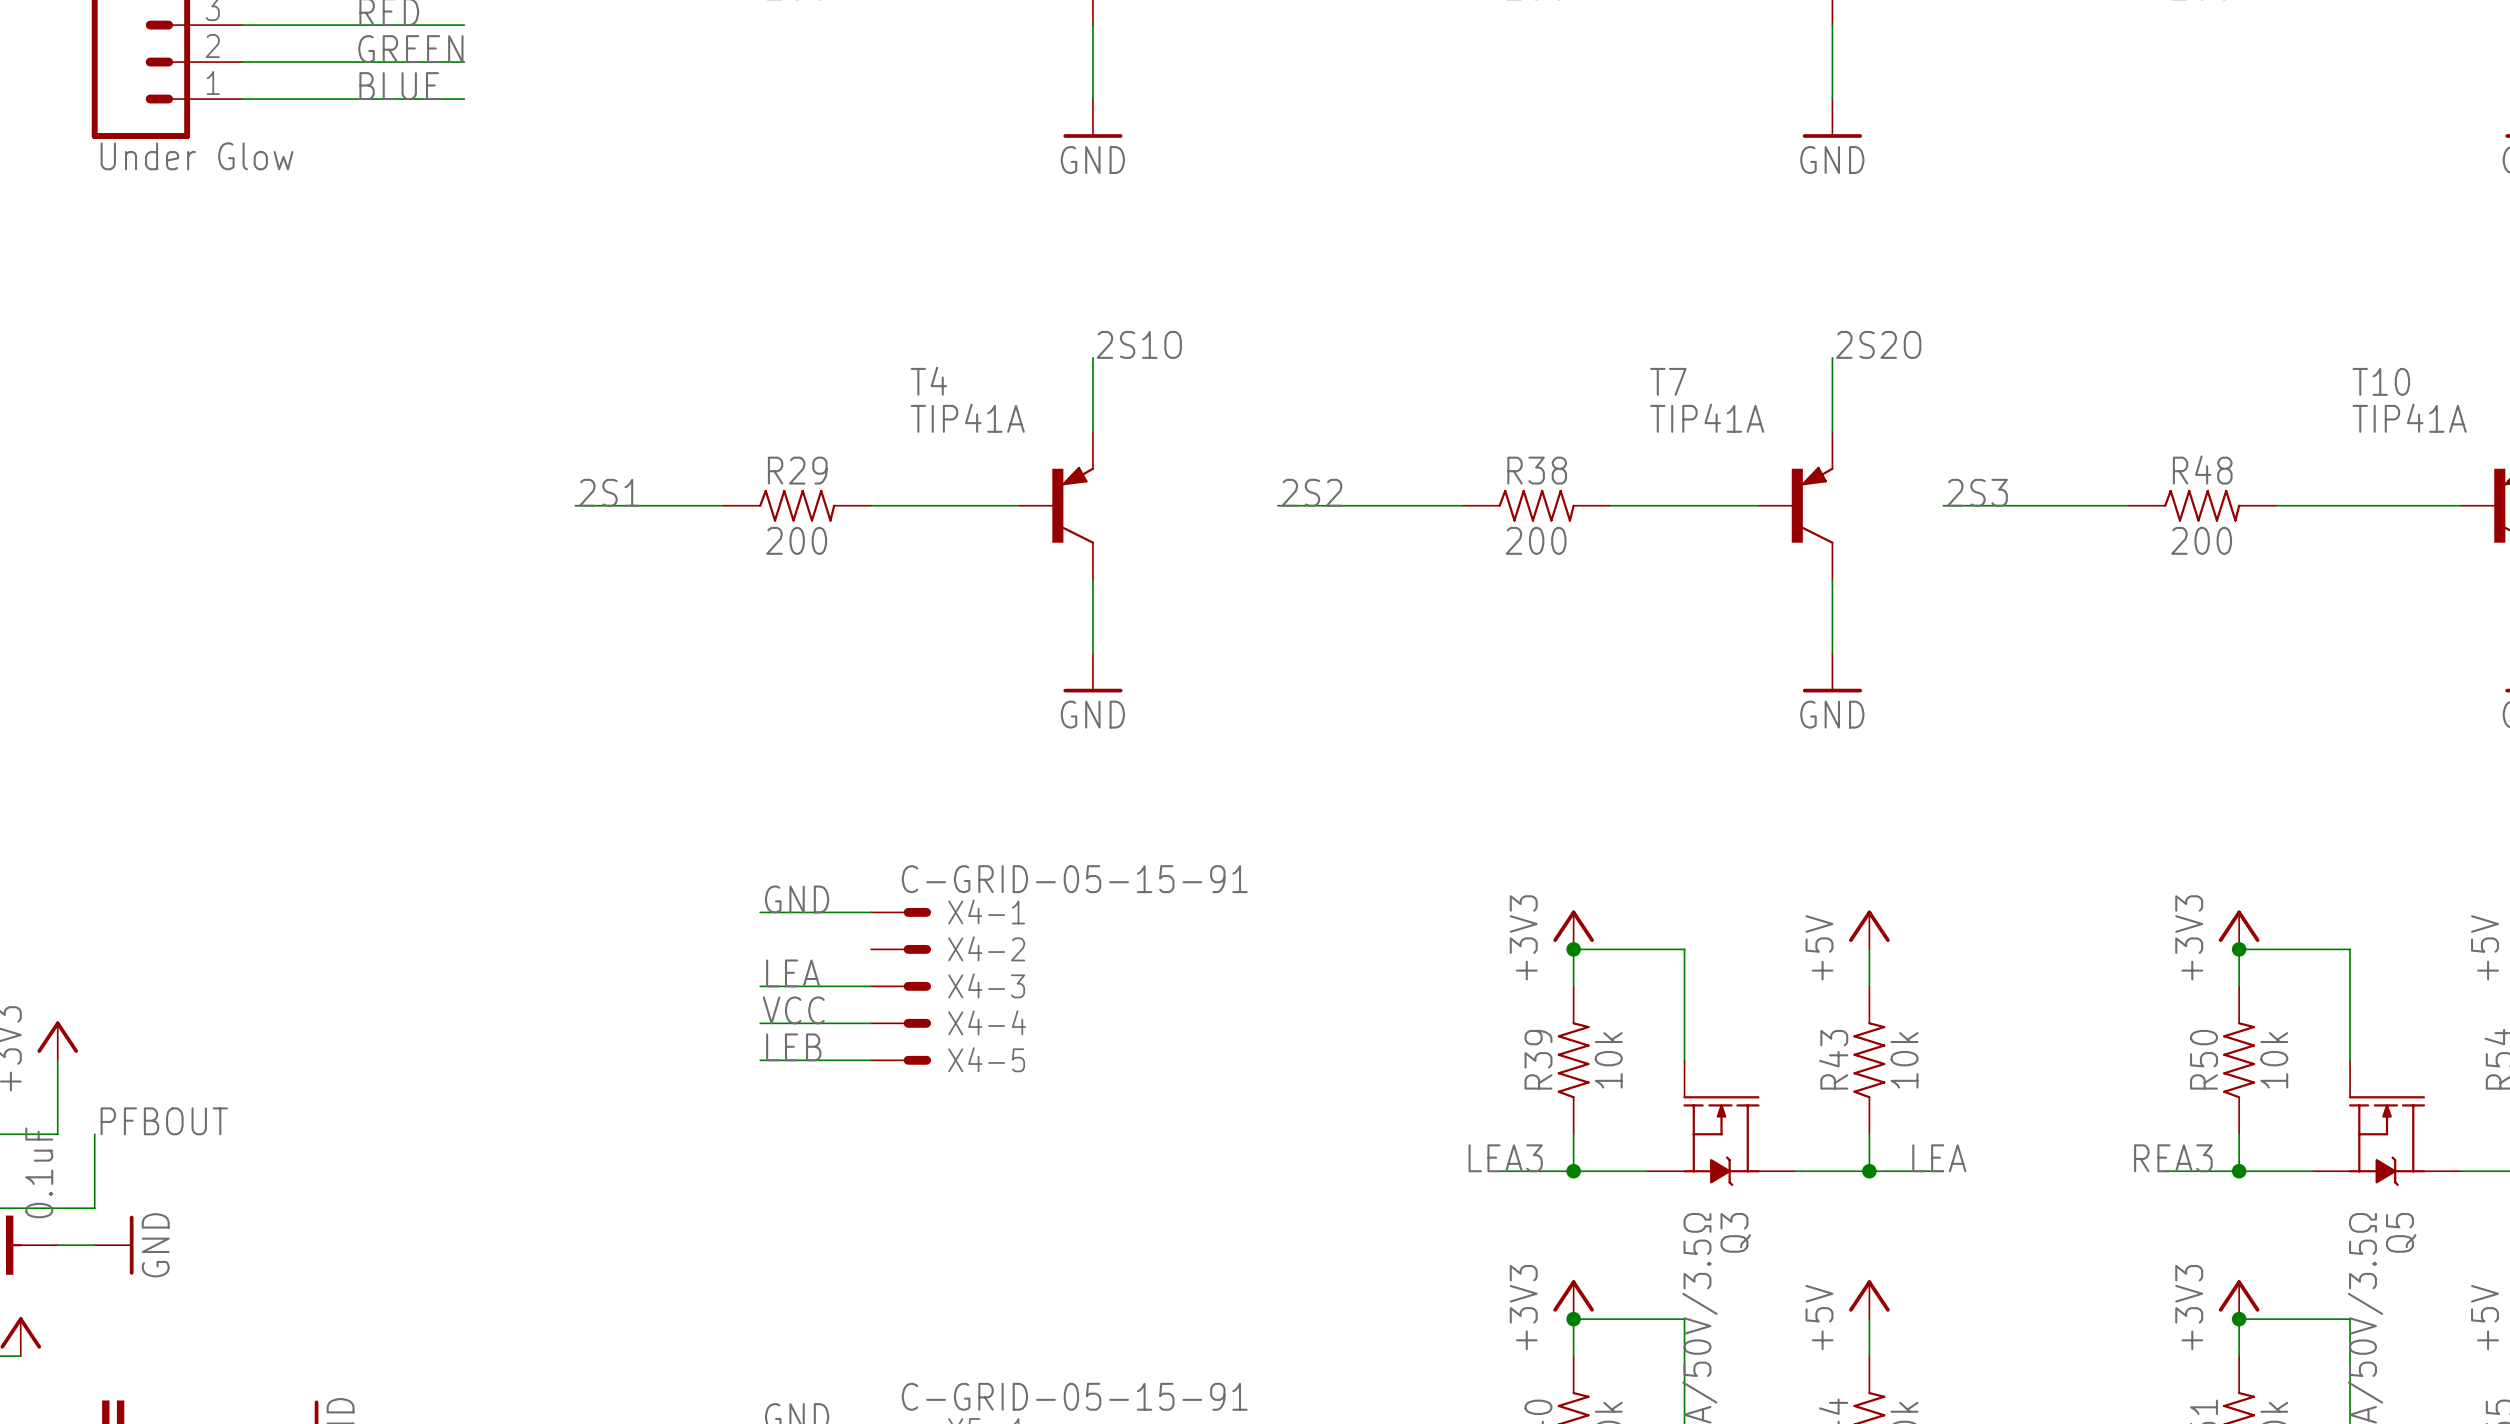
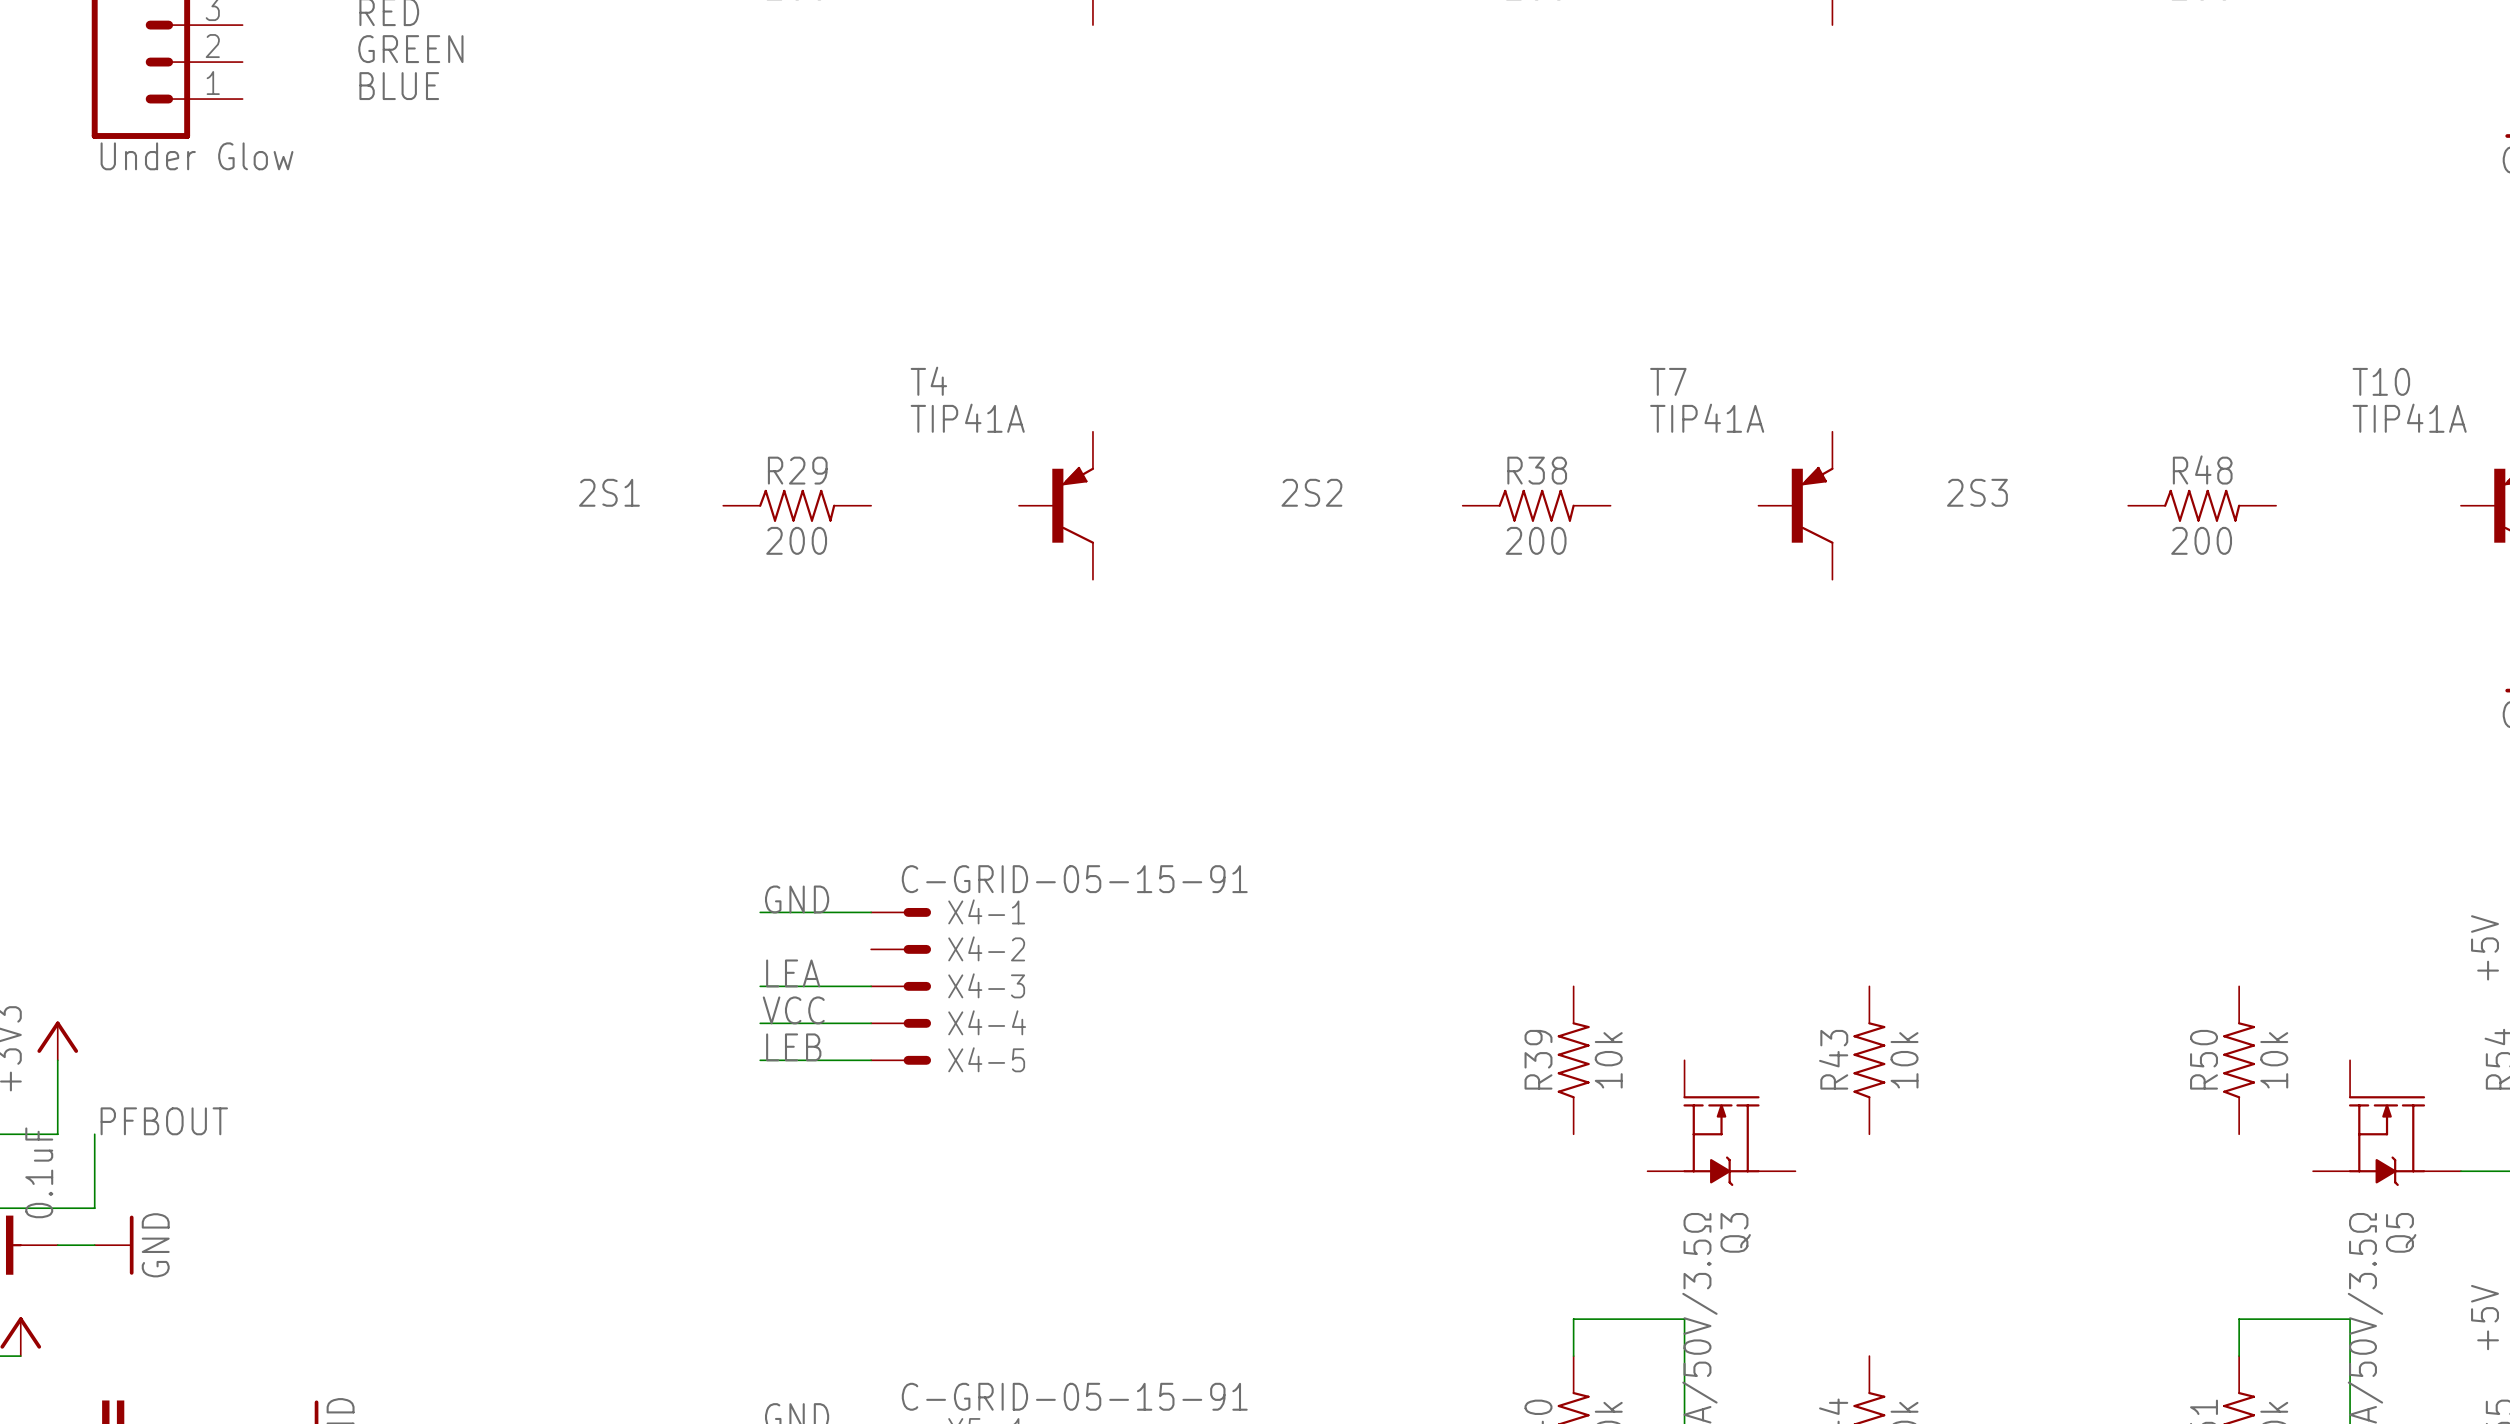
wire: (242, 25) (464, 25) -> none
wire: (1092, 25) (1092, 99) -> none
wire: (1832, 25) (1832, 99) -> none
wire: (242, 62) (464, 62) -> none
wire: (242, 99) (464, 99) -> none
power symbol: GND (1092, 118) -> none
power symbol: GND (1832, 118) -> none
label: 2S1O (1139, 344) -> none
label: 2S2O (1878, 344) -> none
wire: (1092, 357) (1092, 431) -> none
wire: (1832, 357) (1832, 431) -> none
wire: (575, 505) (723, 505) -> none
wire: (871, 505) (1019, 505) -> none
wire: (1277, 505) (1462, 505) -> none
wire: (1610, 505) (1758, 505) -> none
wire: (1943, 505) (2128, 505) -> none
wire: (2276, 505) (2460, 505) -> none
wire: (1092, 579) (1092, 653) -> none
wire: (1832, 579) (1832, 653) -> none
power symbol: GND (1092, 673) -> none
power symbol: GND (1832, 673) -> none
power symbol: +3V3 (1573, 929) -> none
power symbol: +5V (1869, 929) -> none
power symbol: +3V3 (2239, 929) -> none
junction: (1573, 949) -> none
wire: (1869, 949) (1869, 986) -> none
junction: (2239, 949) -> none
wire: (1573, 986) (1573, 949) (1684, 949) (1684, 1060) -> none
wire: (2239, 986) (2239, 949) (2350, 949) (2350, 1060) -> none
wire: (1573, 1134) (1573, 1171) -> none
wire: (1869, 1134) (1869, 1171) -> none
wire: (2239, 1134) (2239, 1171) -> none
label: LEA3 (1505, 1158) -> none
label: LEA (1939, 1158) -> none
label: REA3 (2173, 1158) -> none
wire: (1499, 1171) (1647, 1171) -> none
junction: (1573, 1171) -> none
wire: (1795, 1171) (1943, 1171) -> none
junction: (1869, 1171) -> none
wire: (2165, 1171) (2313, 1171) -> none
junction: (2239, 1171) -> none
power symbol: +3V3 (1573, 1299) -> none
power symbol: +5V (1869, 1299) -> none
power symbol: +3V3 (2239, 1299) -> none
junction: (1573, 1319) -> none
wire: (1869, 1319) (1869, 1356) -> none
junction: (2239, 1319) -> none

